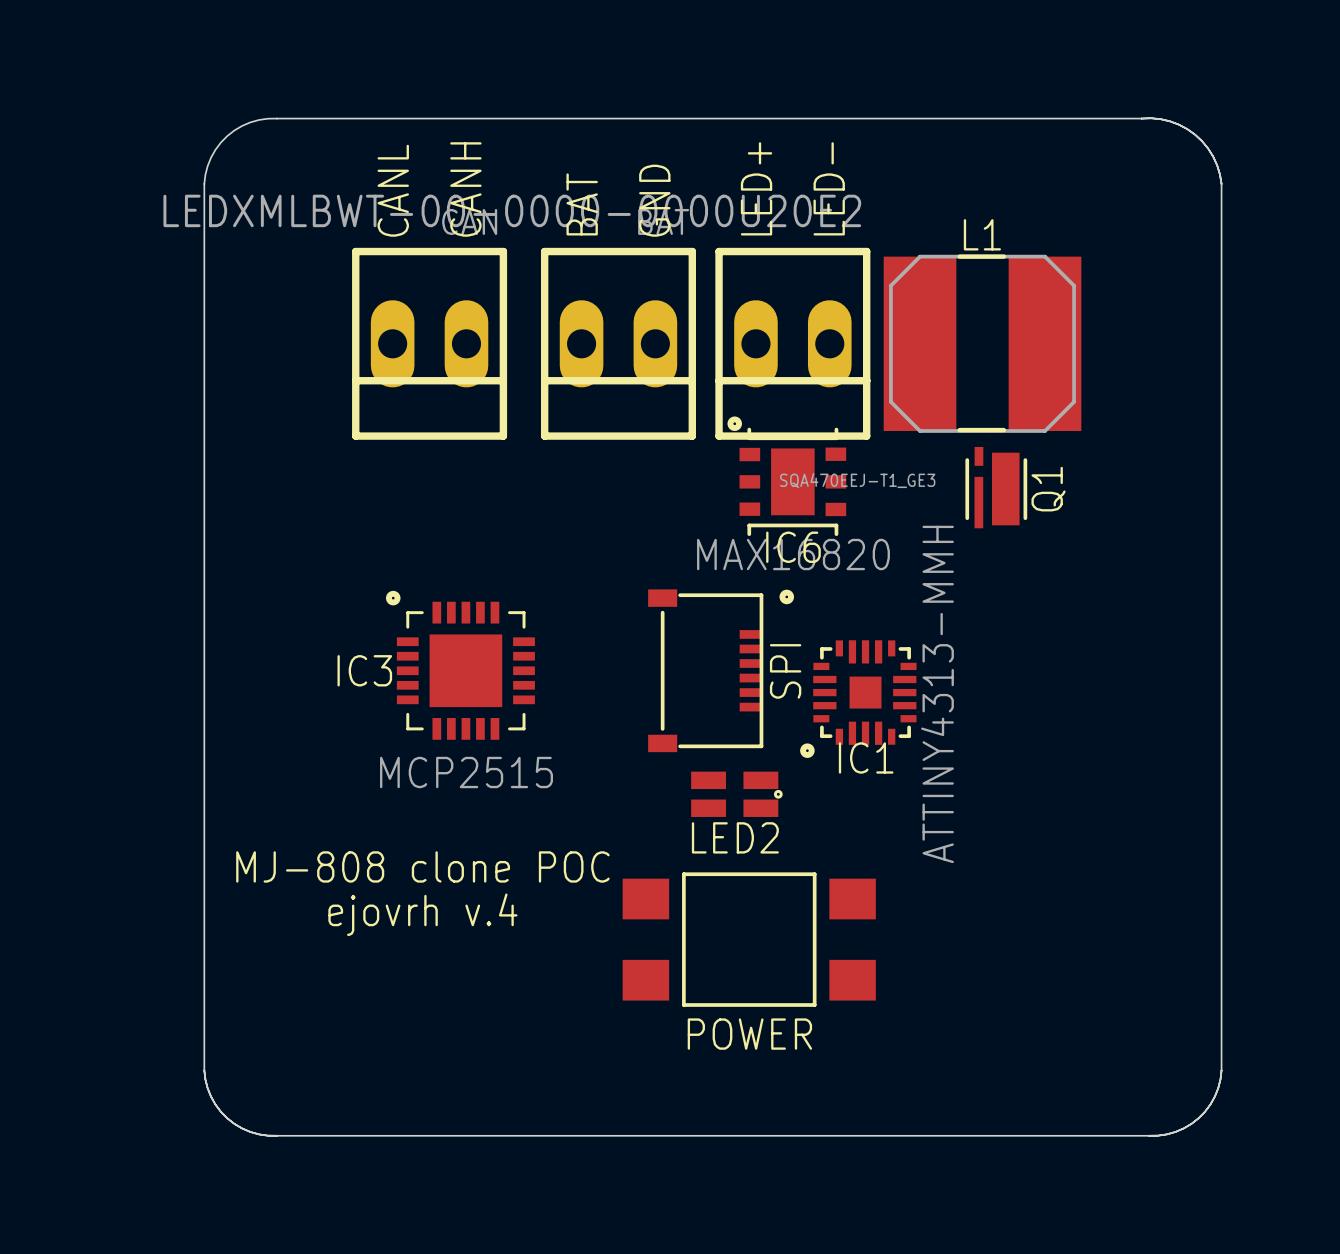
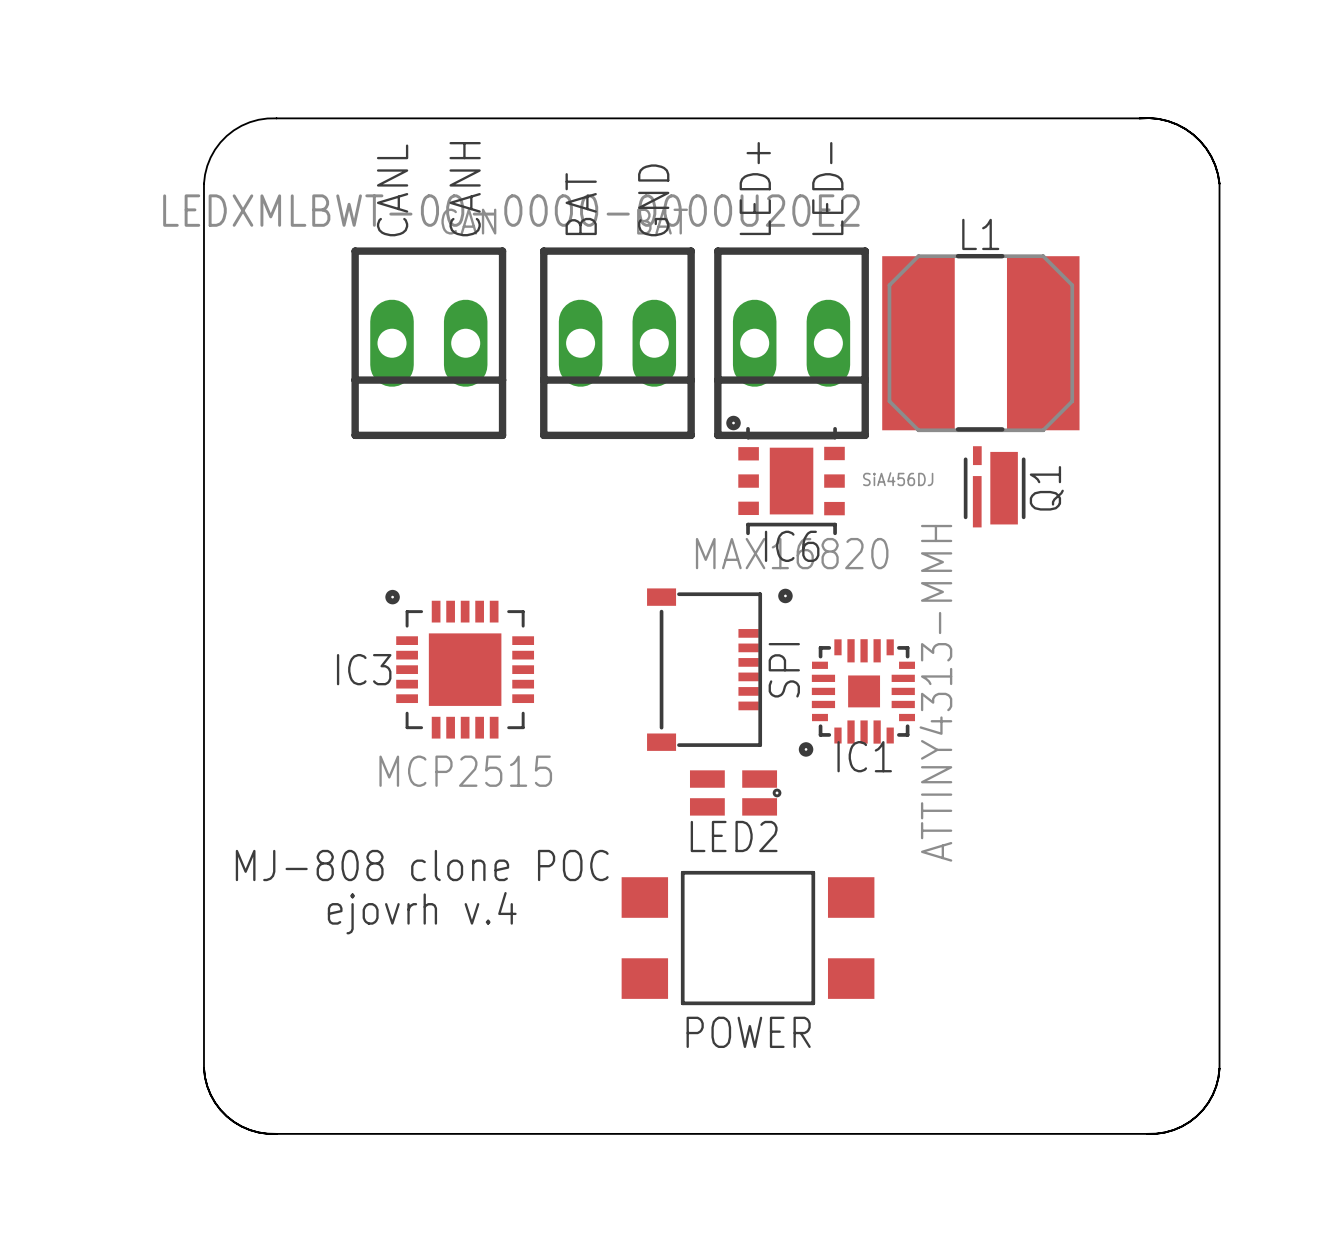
Q1 value: SQA470EEJ-T1_GE3 (857, 480) -> SiA456DJ (898, 479)

